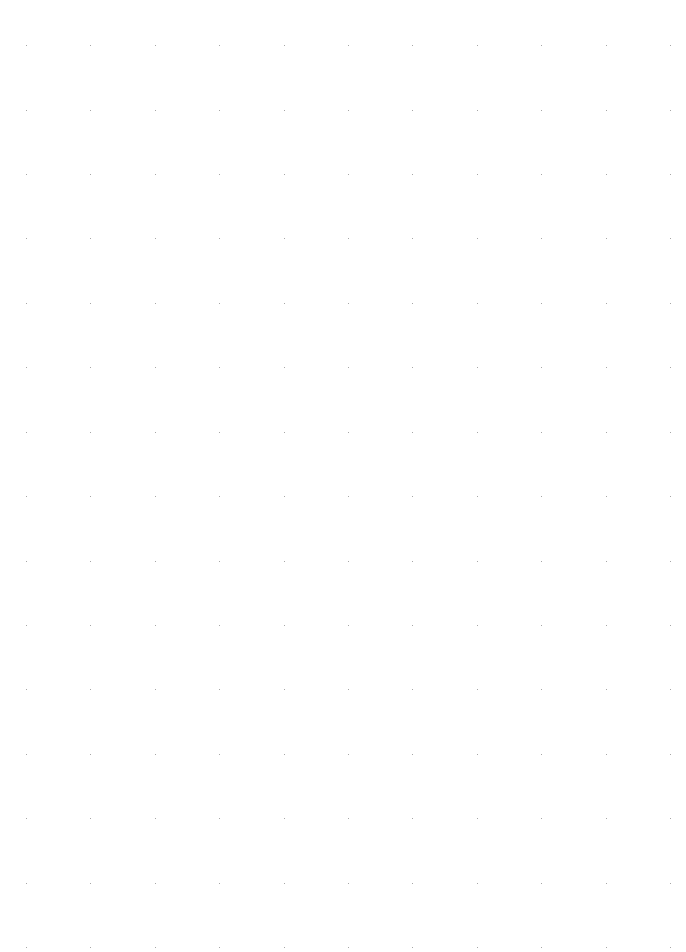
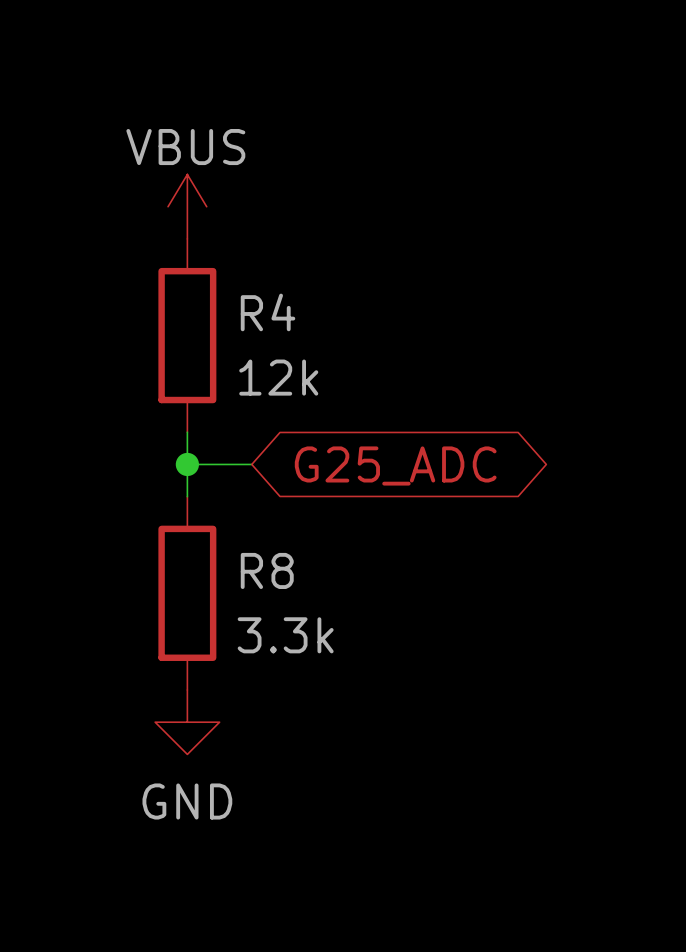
power symbol: none -> VBUS (187, 206)
R4: none -> 12k (187, 335)
wire: none -> (187, 432) (187, 496)
wire: none -> (187, 464) (251, 464)
junction: none -> (187, 464)
global label: none -> G25_ADC (395, 465)
R8: none -> 3.3k (187, 593)
power symbol: none -> GND (187, 722)

